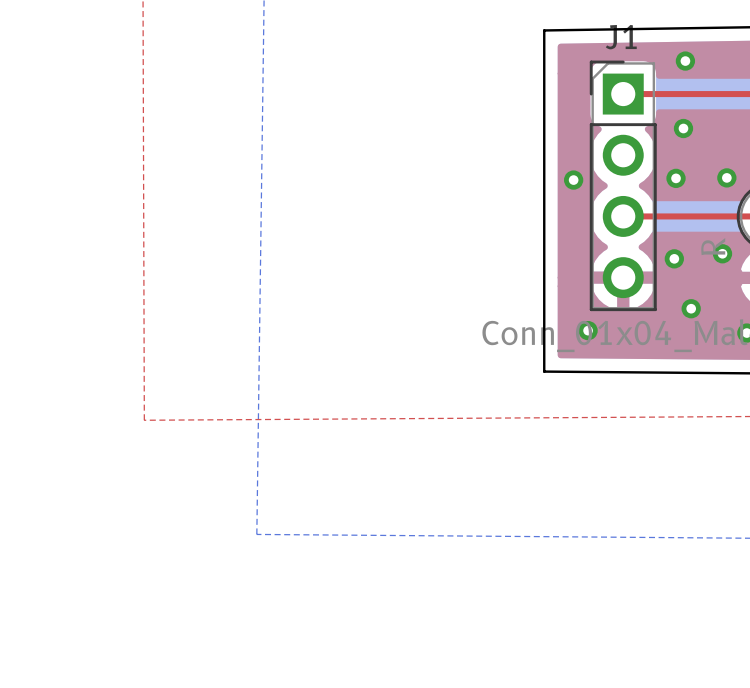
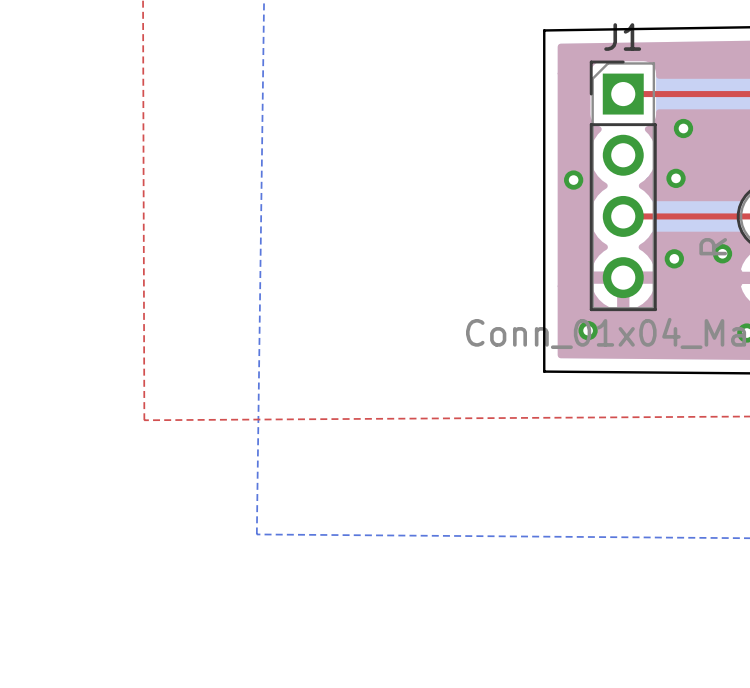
via: (685, 61) -> none
via: (726, 177) -> none
via: (691, 308) -> none

